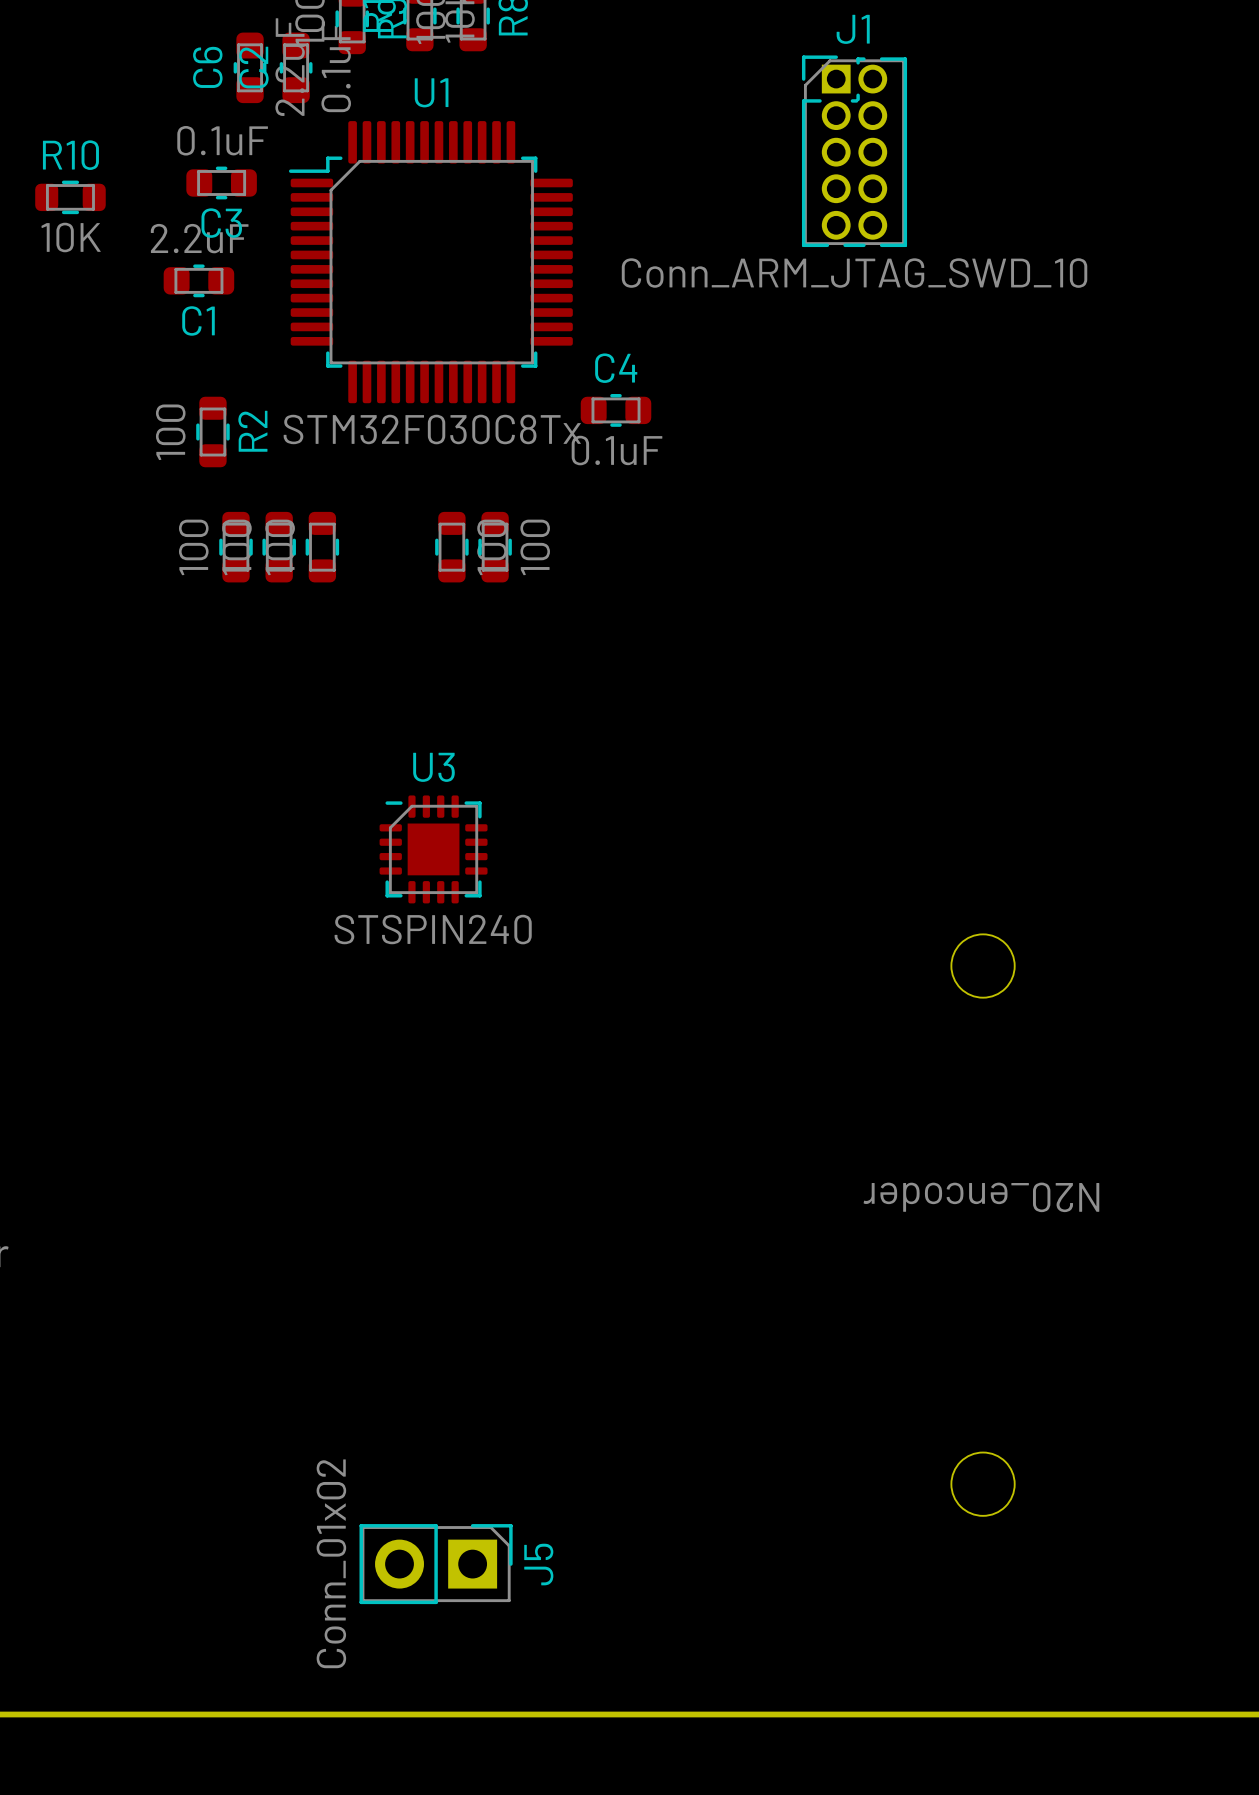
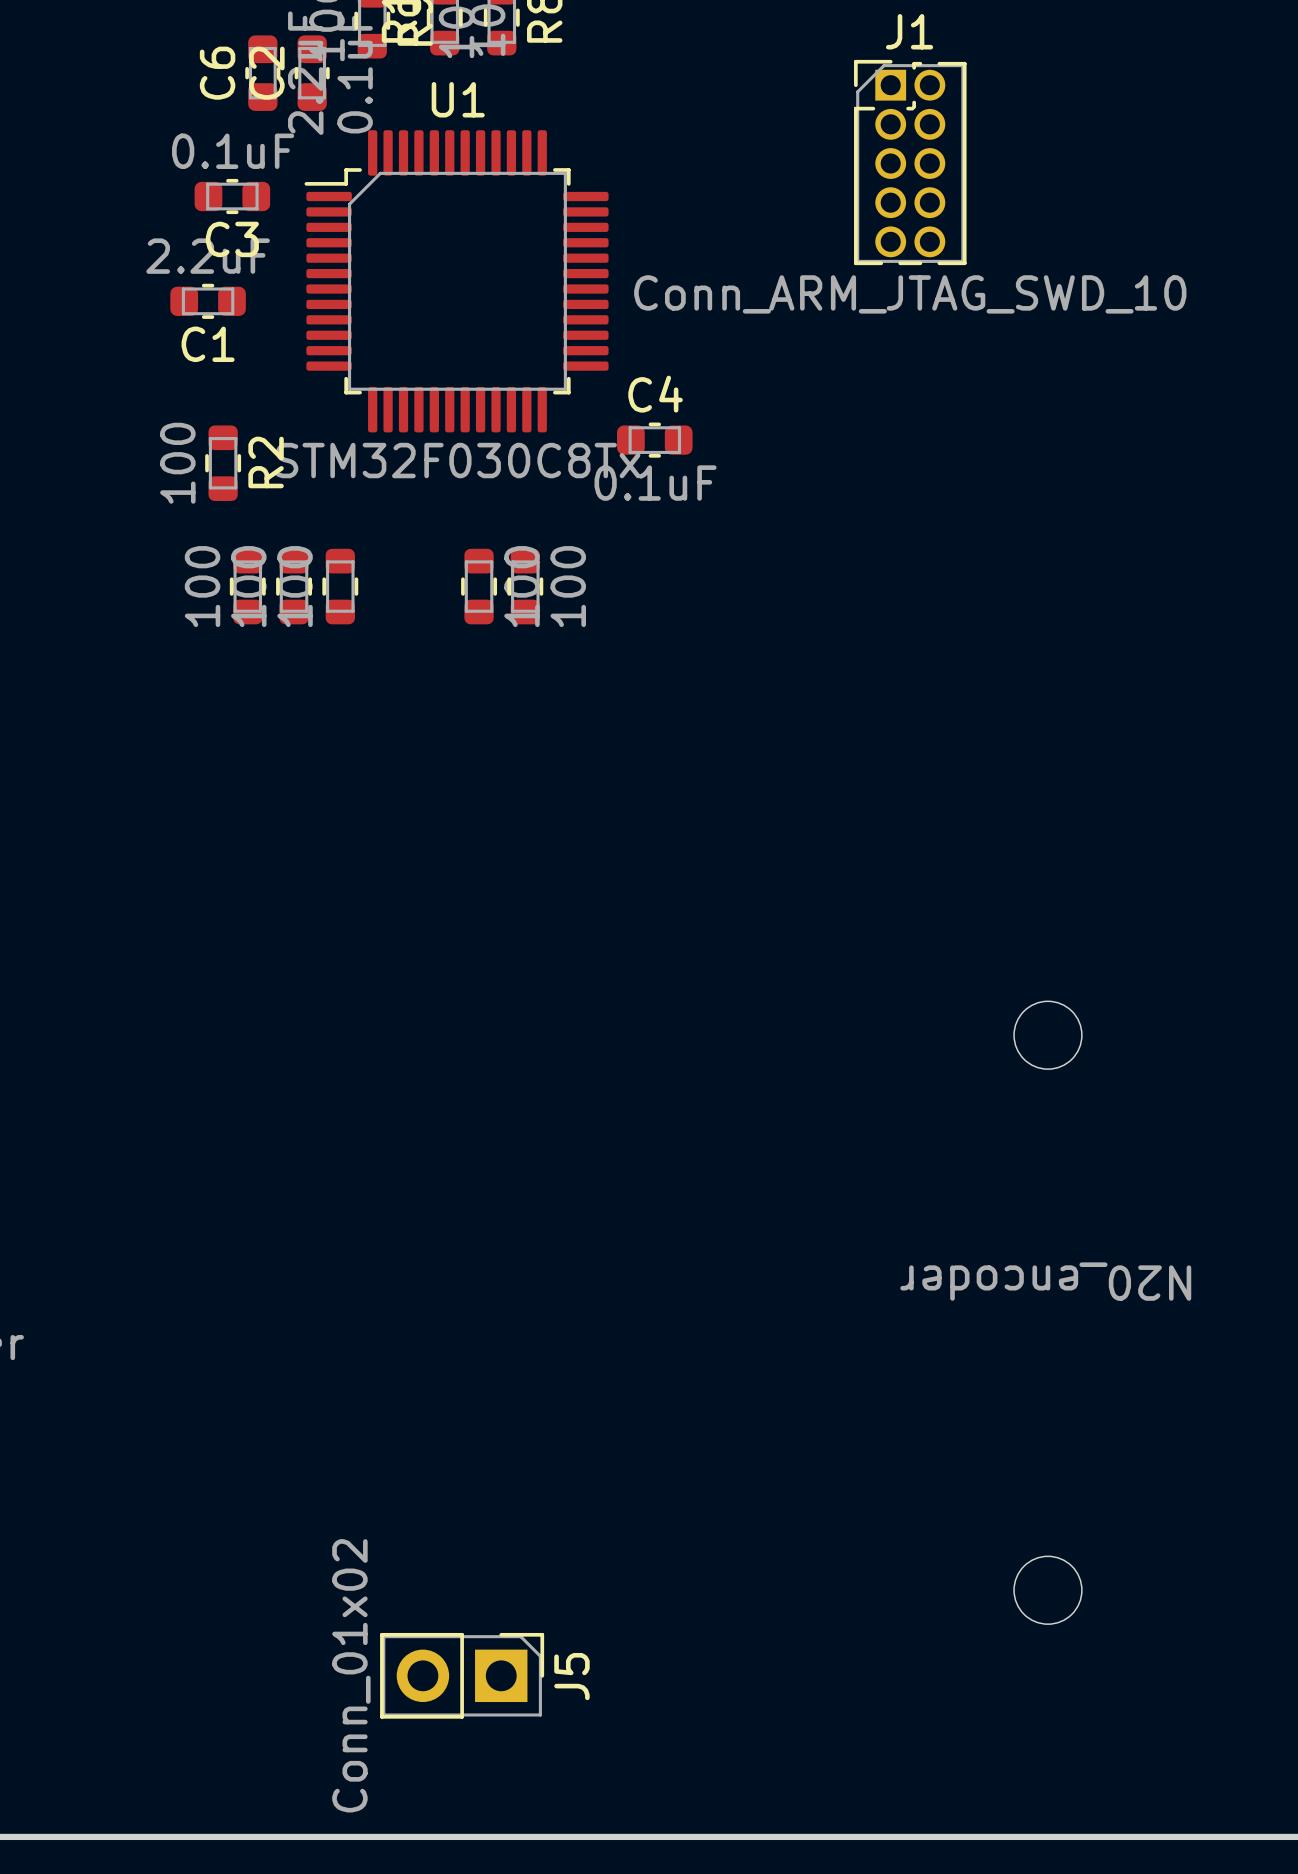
R10: 10K (70, 197) -> none
U3: STSPIN240 (433, 849) -> none

